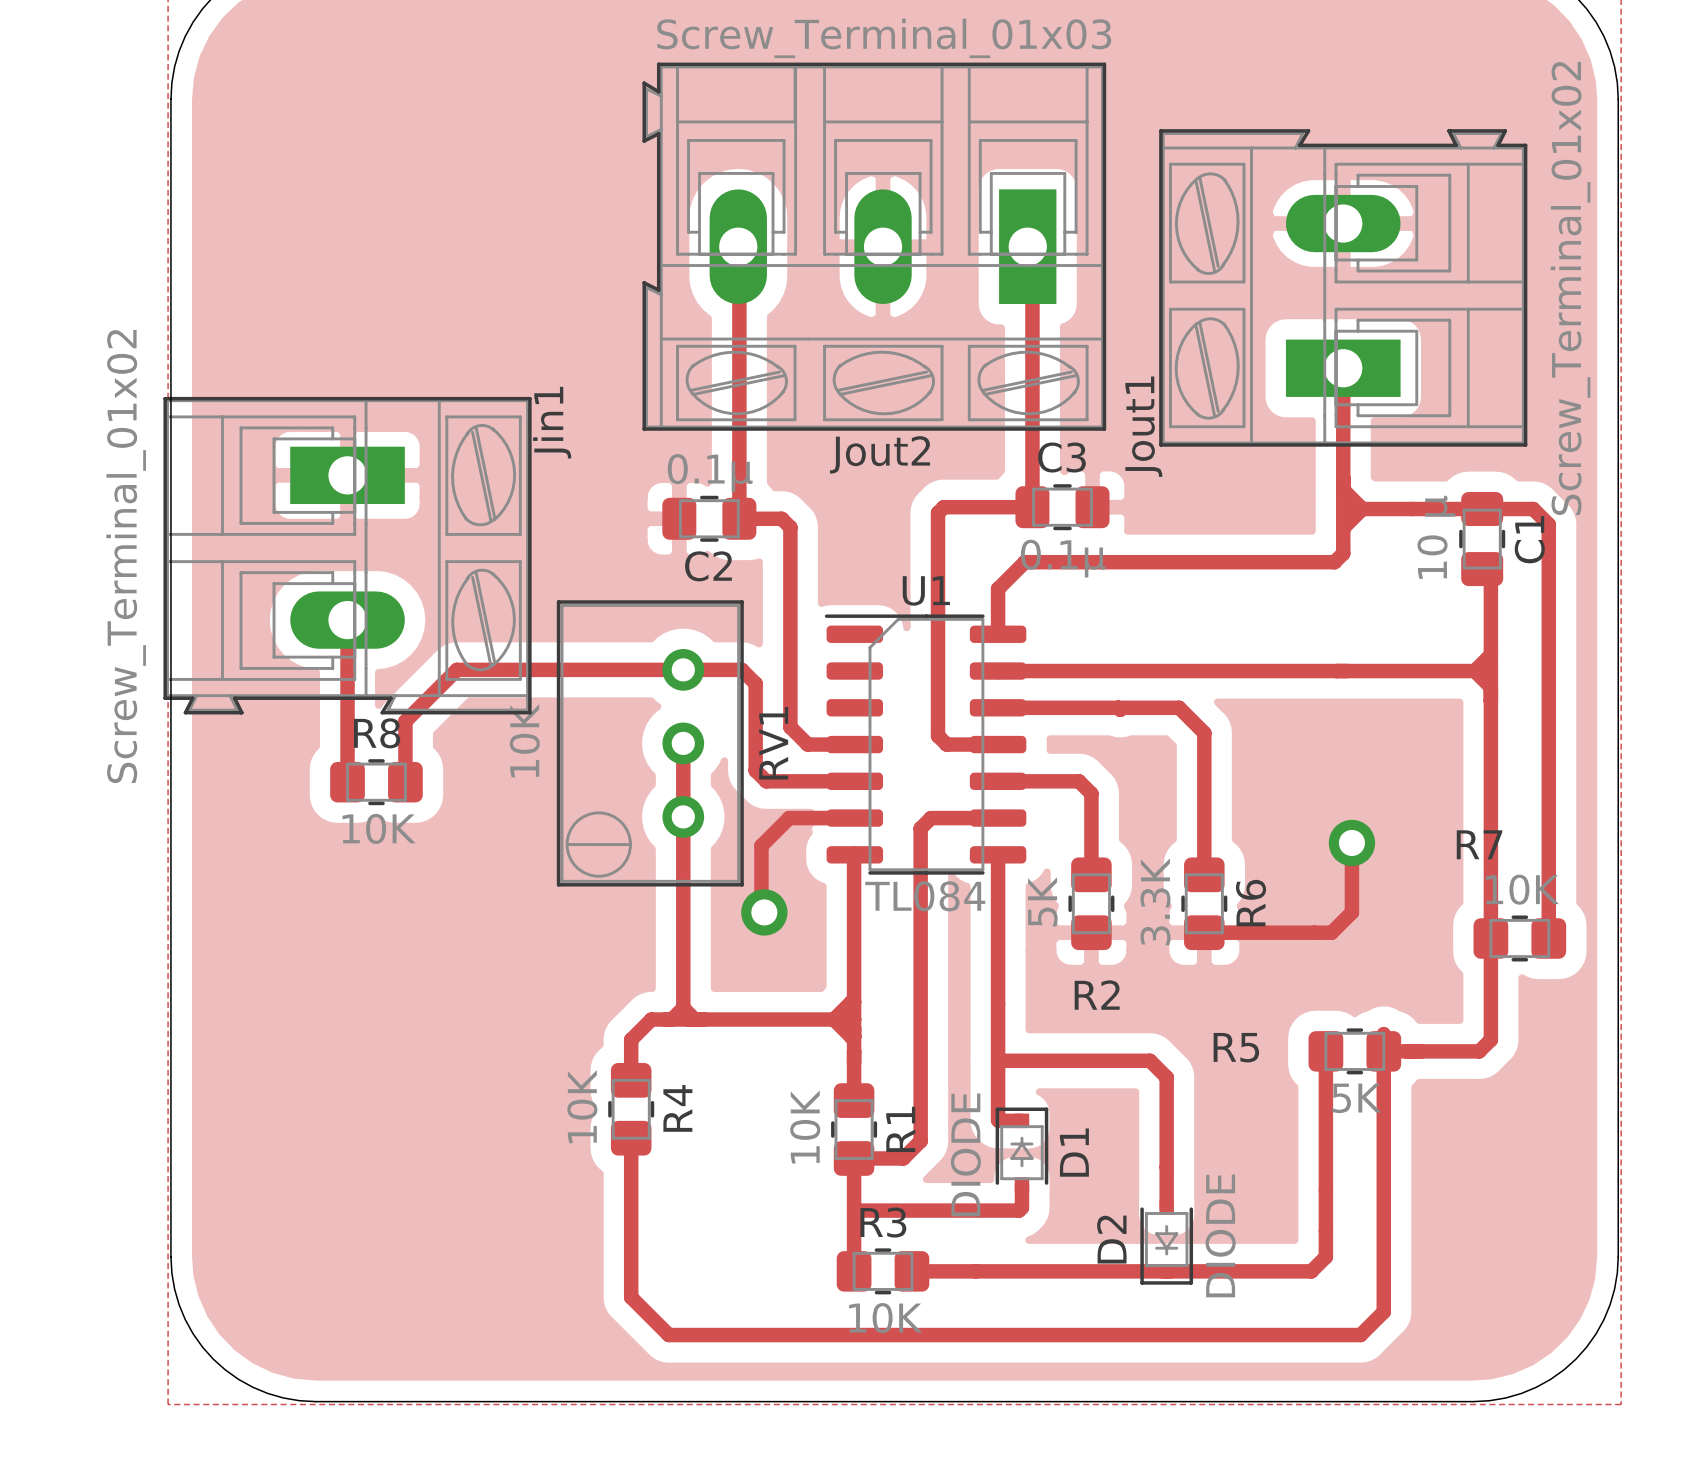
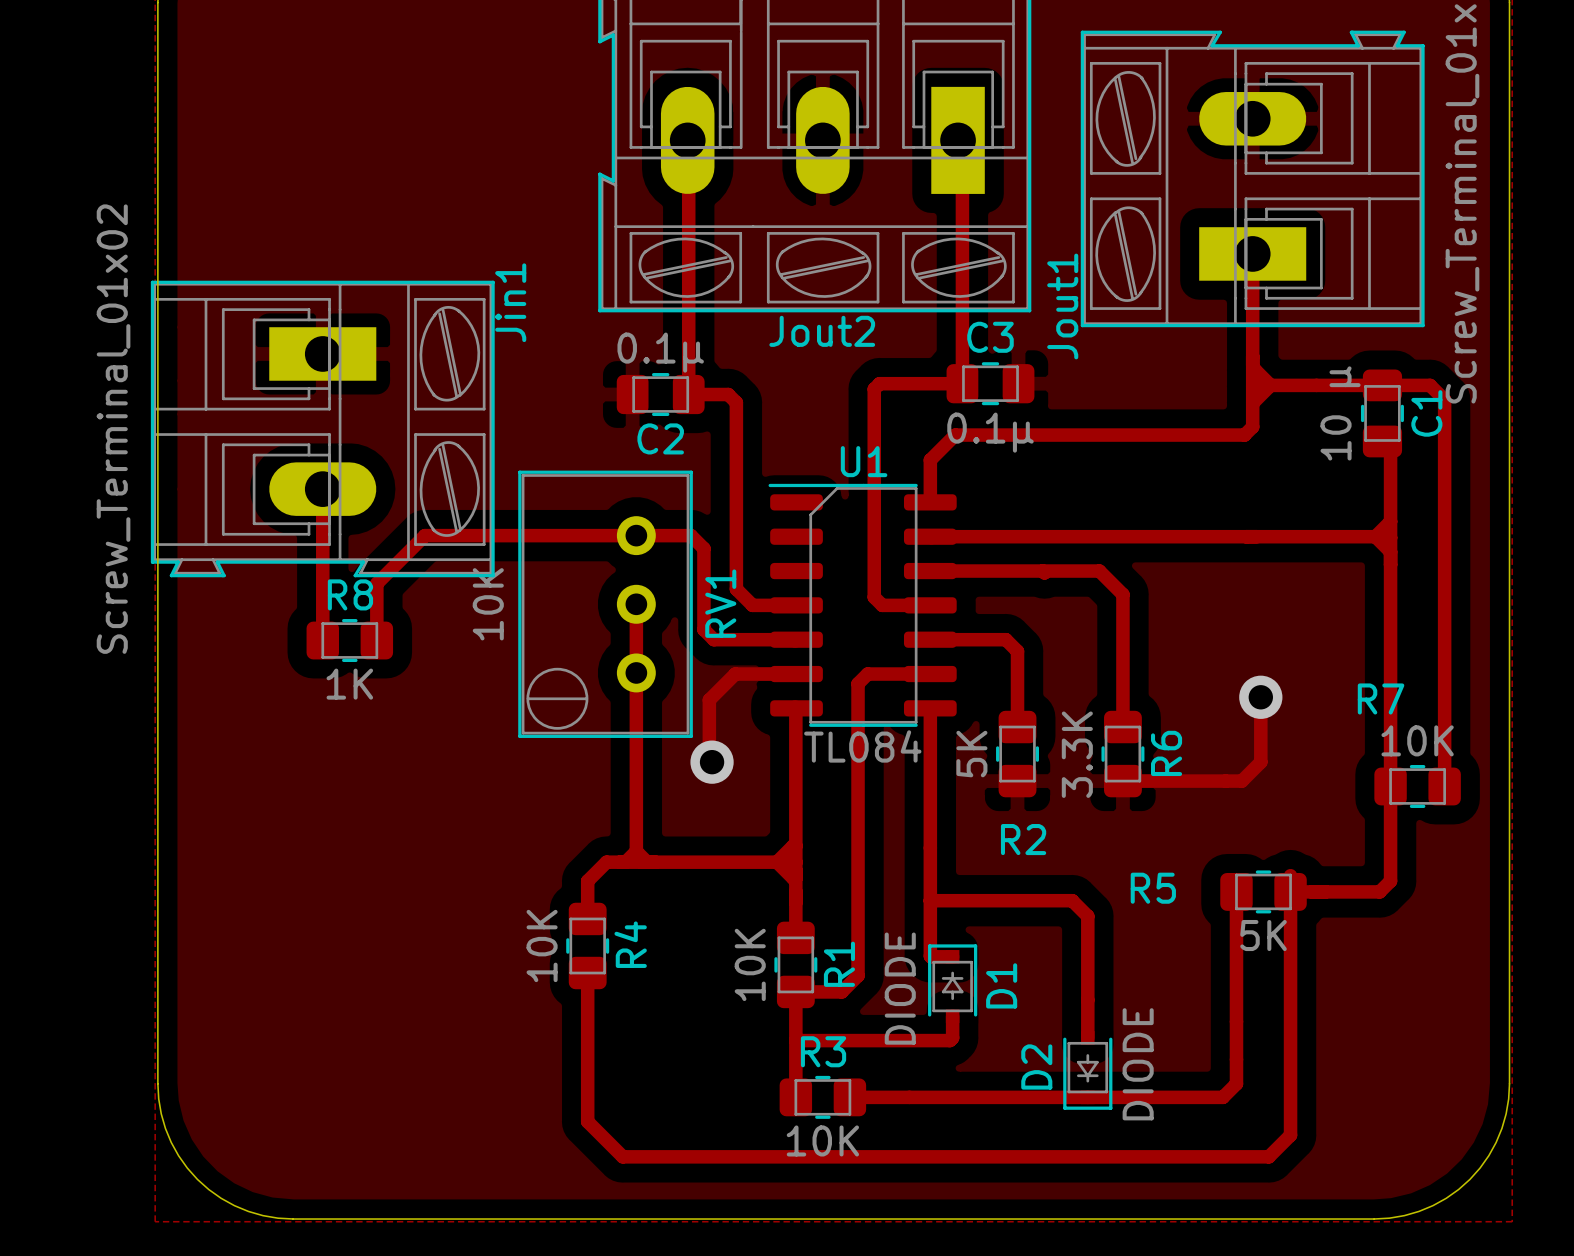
R8 value: 10K (379, 828) -> 1K (349, 684)

